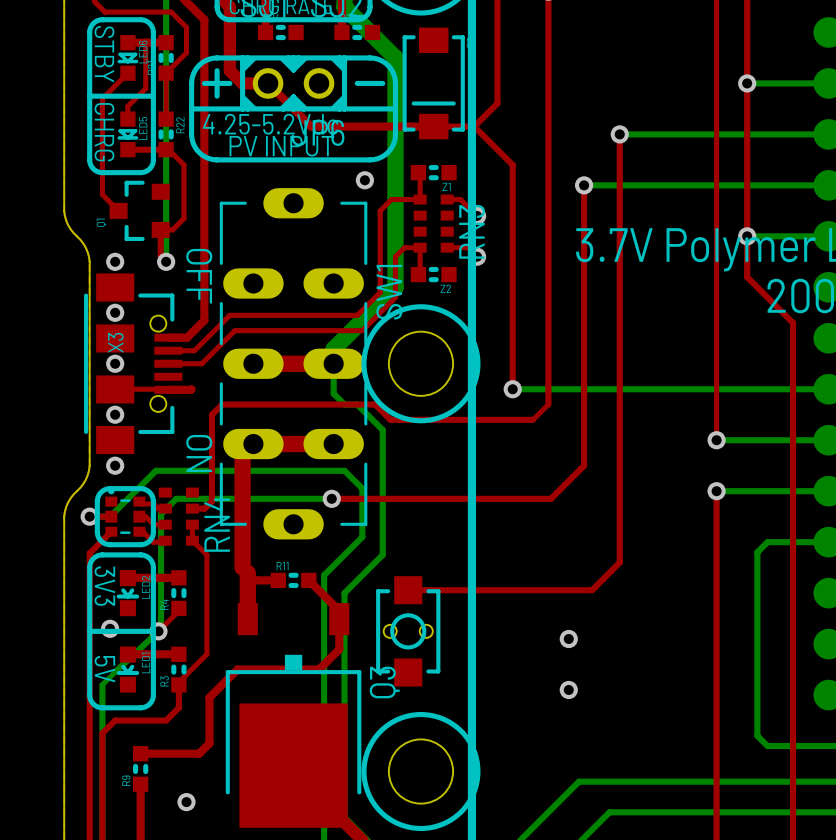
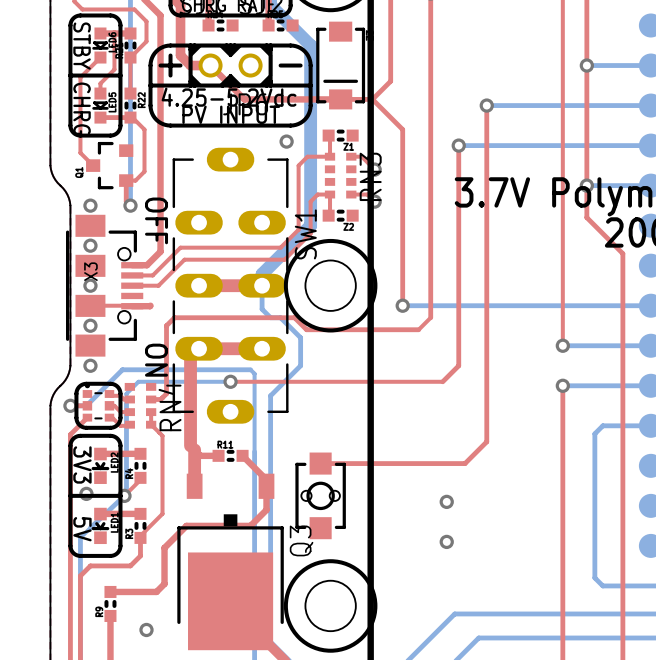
bottom track: (382, 465) (382, 554) (344, 593) -> (300, 365) (270, 395) (270, 465)
bottom track: (319, 470) (344, 470) (362, 488) (362, 537) (324, 575) -> (250, 369) (254, 373) (254, 451)
top track: (563, 486) (550, 498) (331, 498) -> (442, 381) (230, 381)
bottom track: (331, 498) (176, 498) (161, 514) -> (230, 381) (138, 381) (126, 393) (126, 403)
via position: (331, 498) -> (230, 381)

